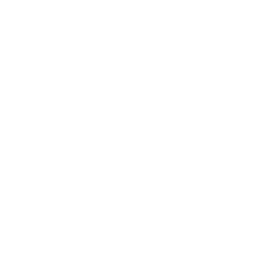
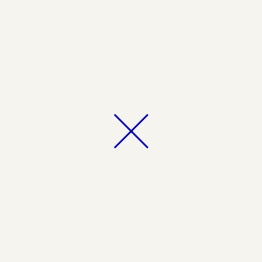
no-connect mark: none -> (131, 131)

